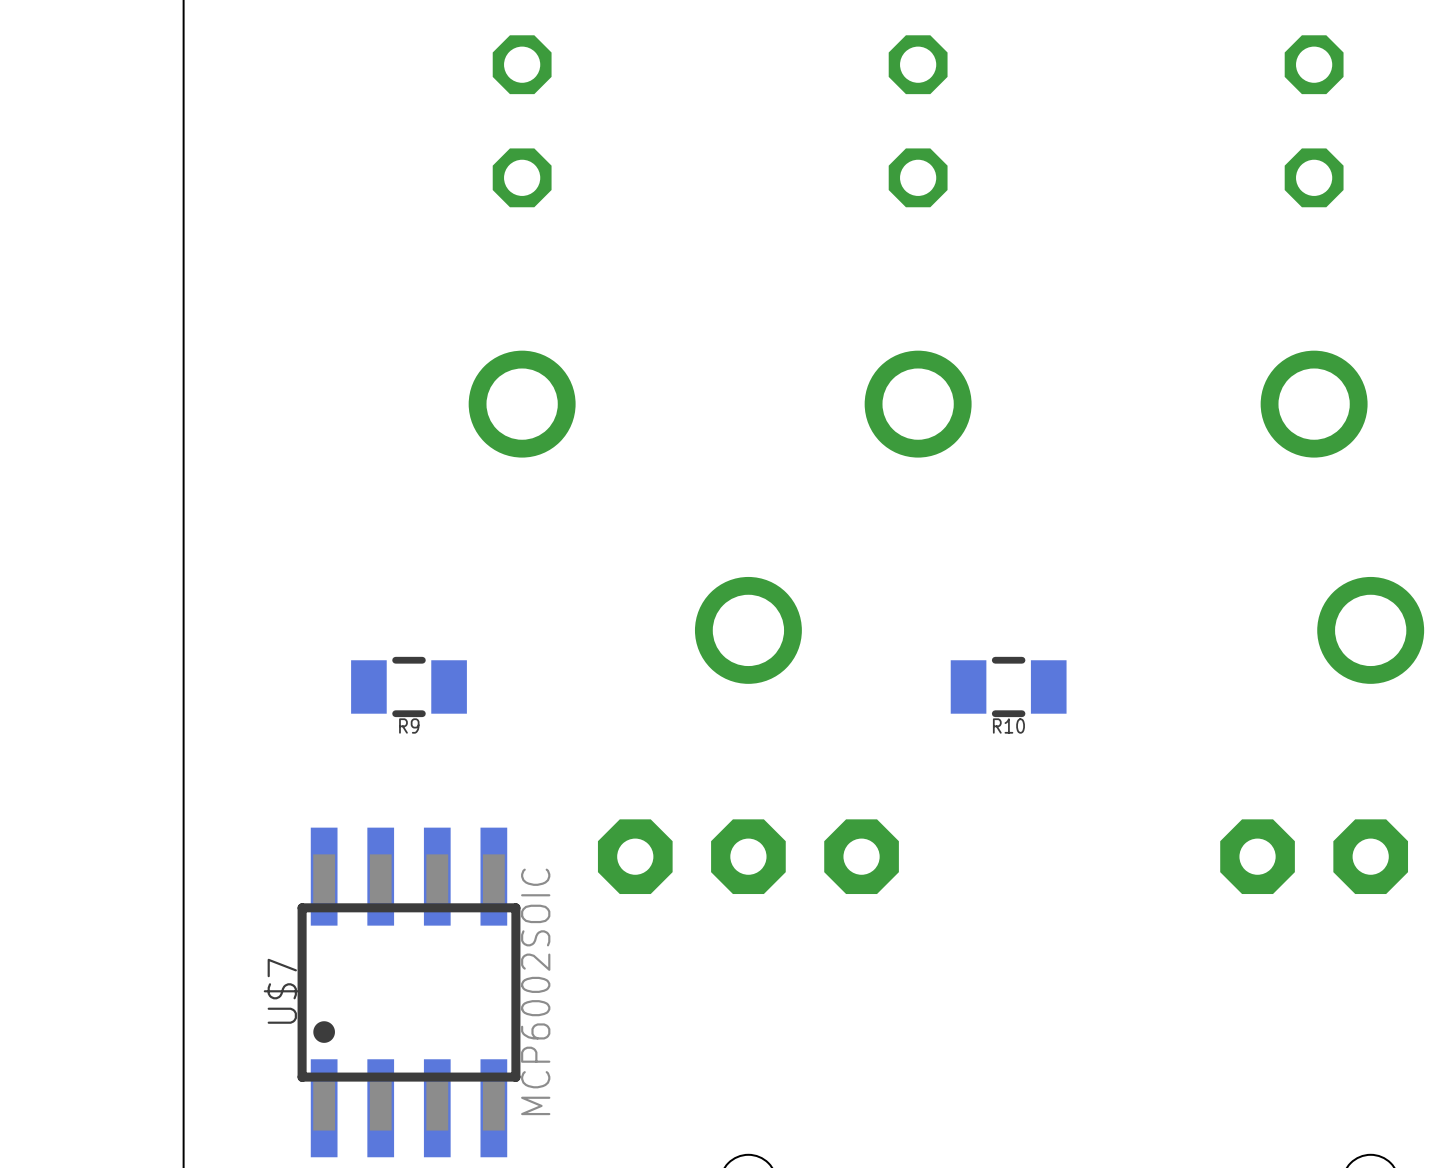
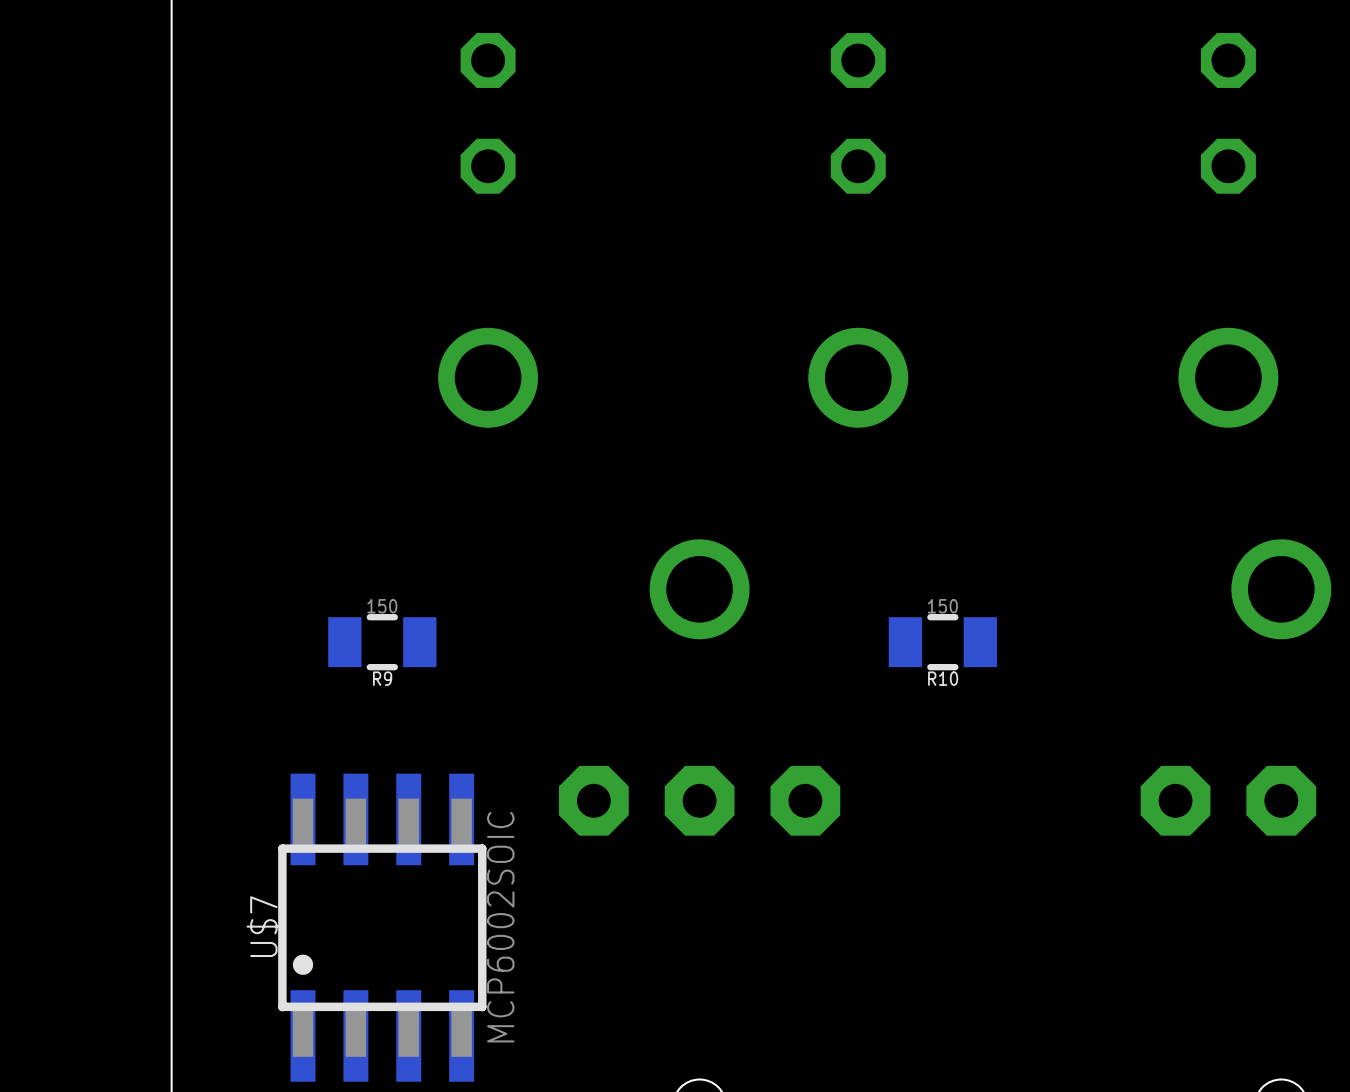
R9 value: none -> 150 (382, 606)
R10 value: none -> 150 (942, 606)

